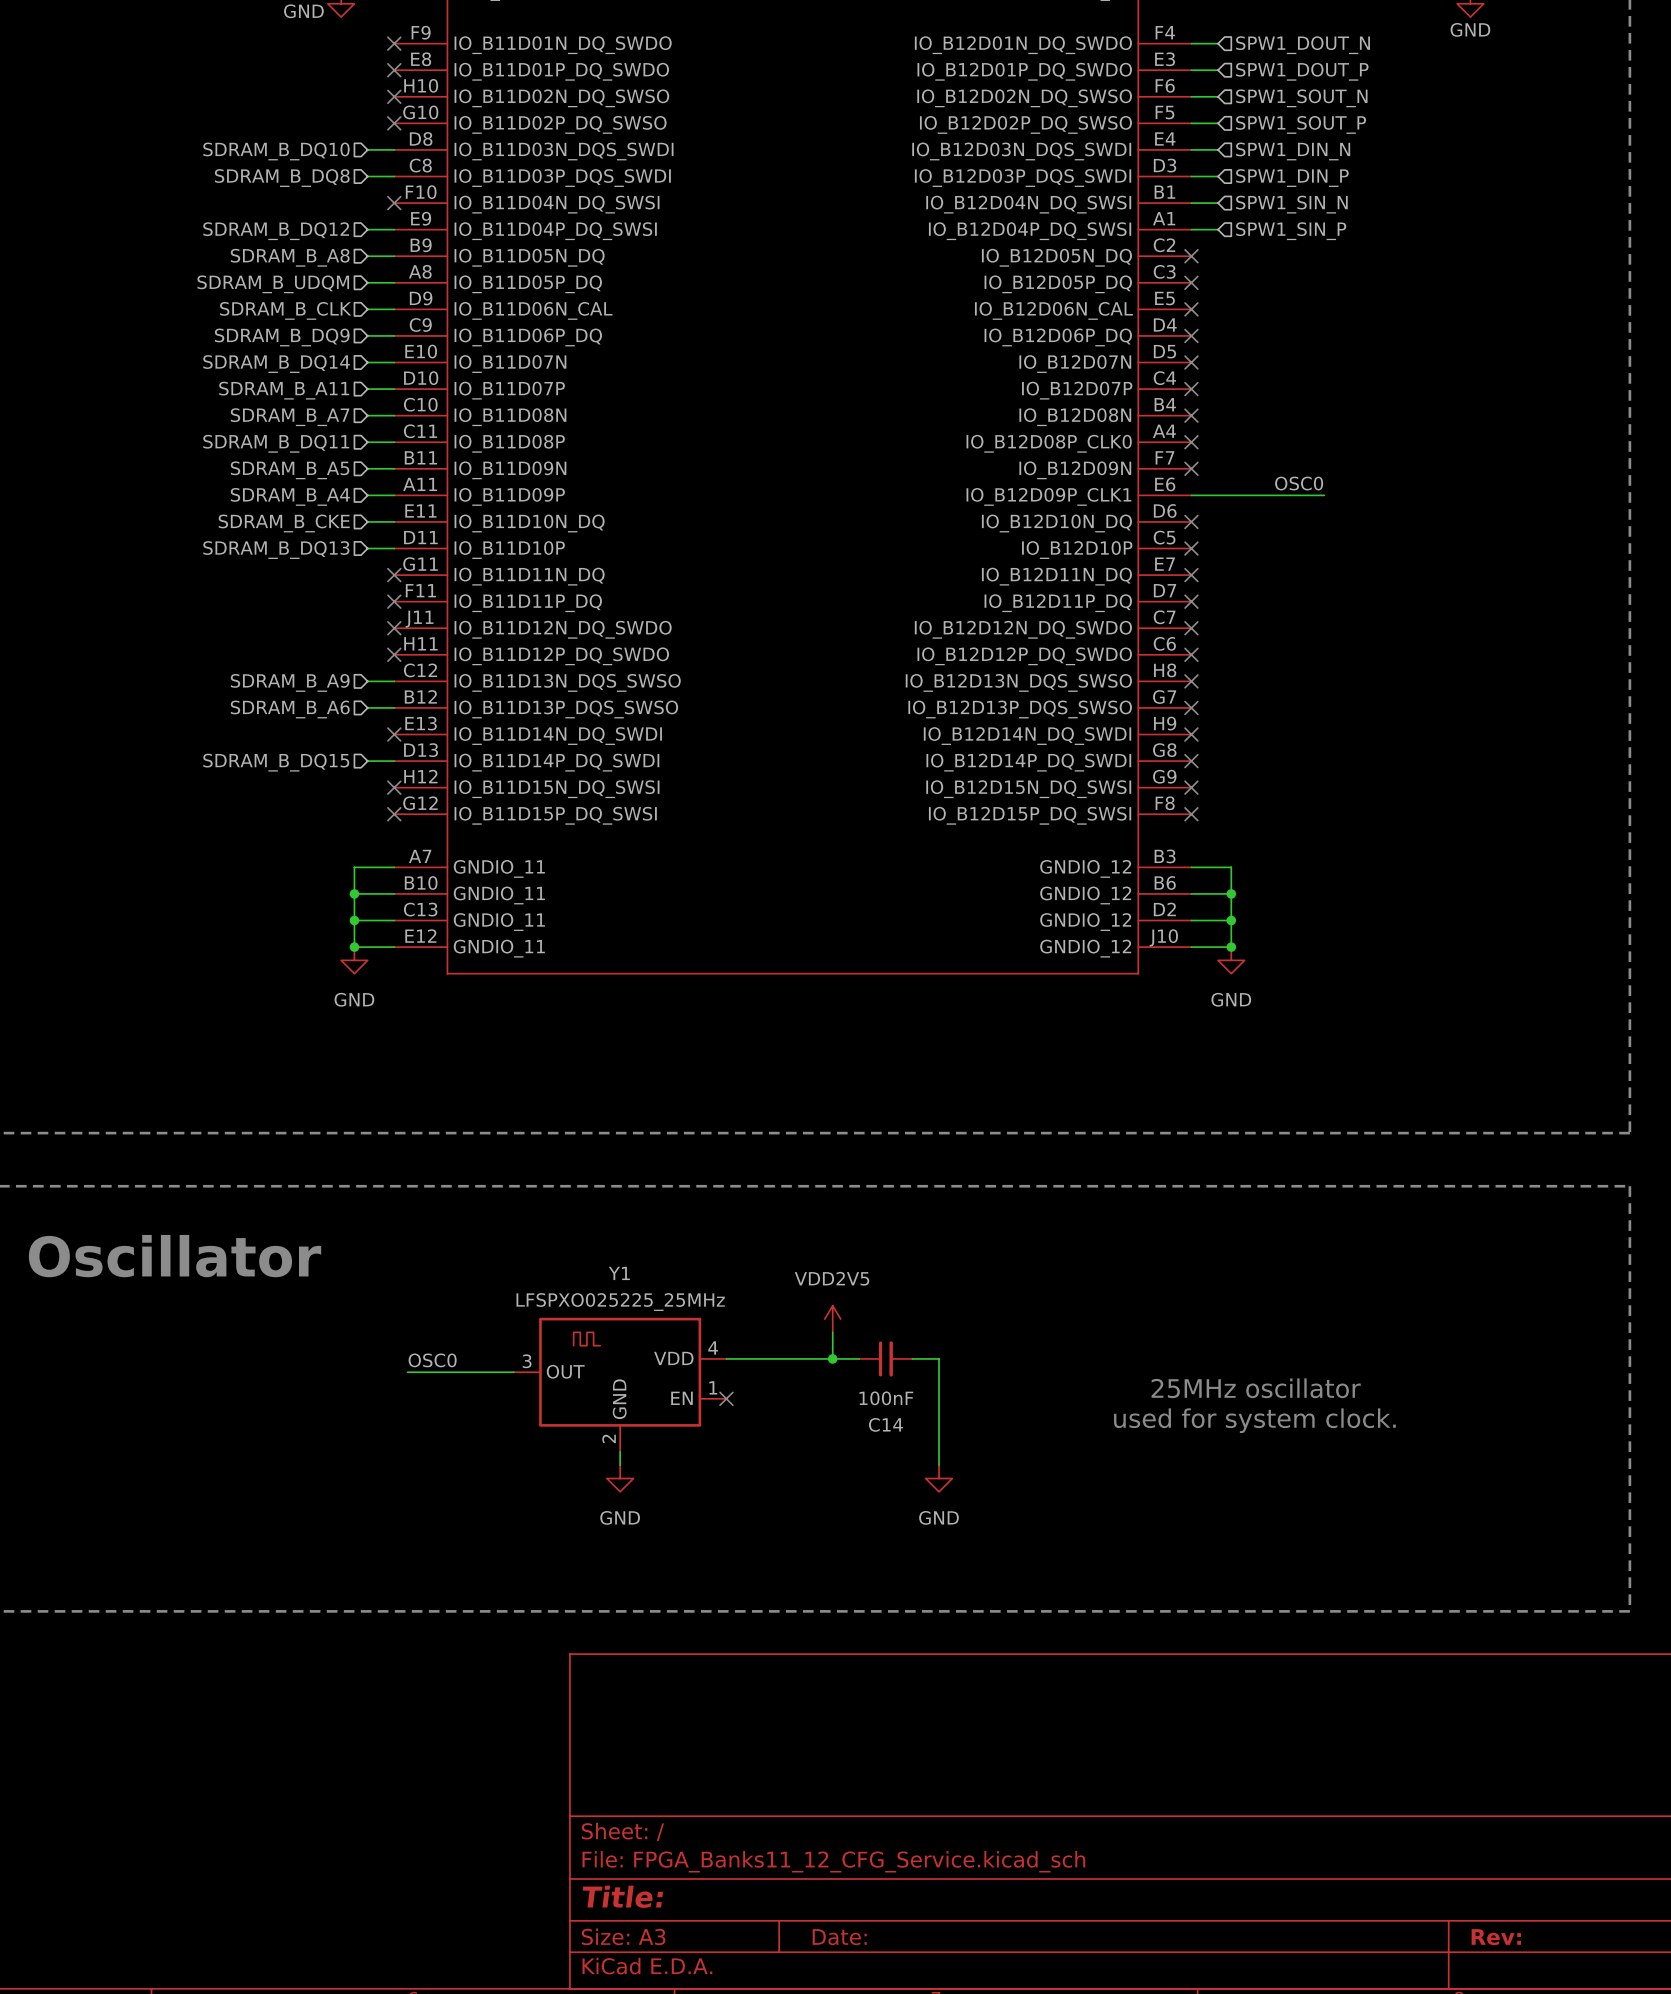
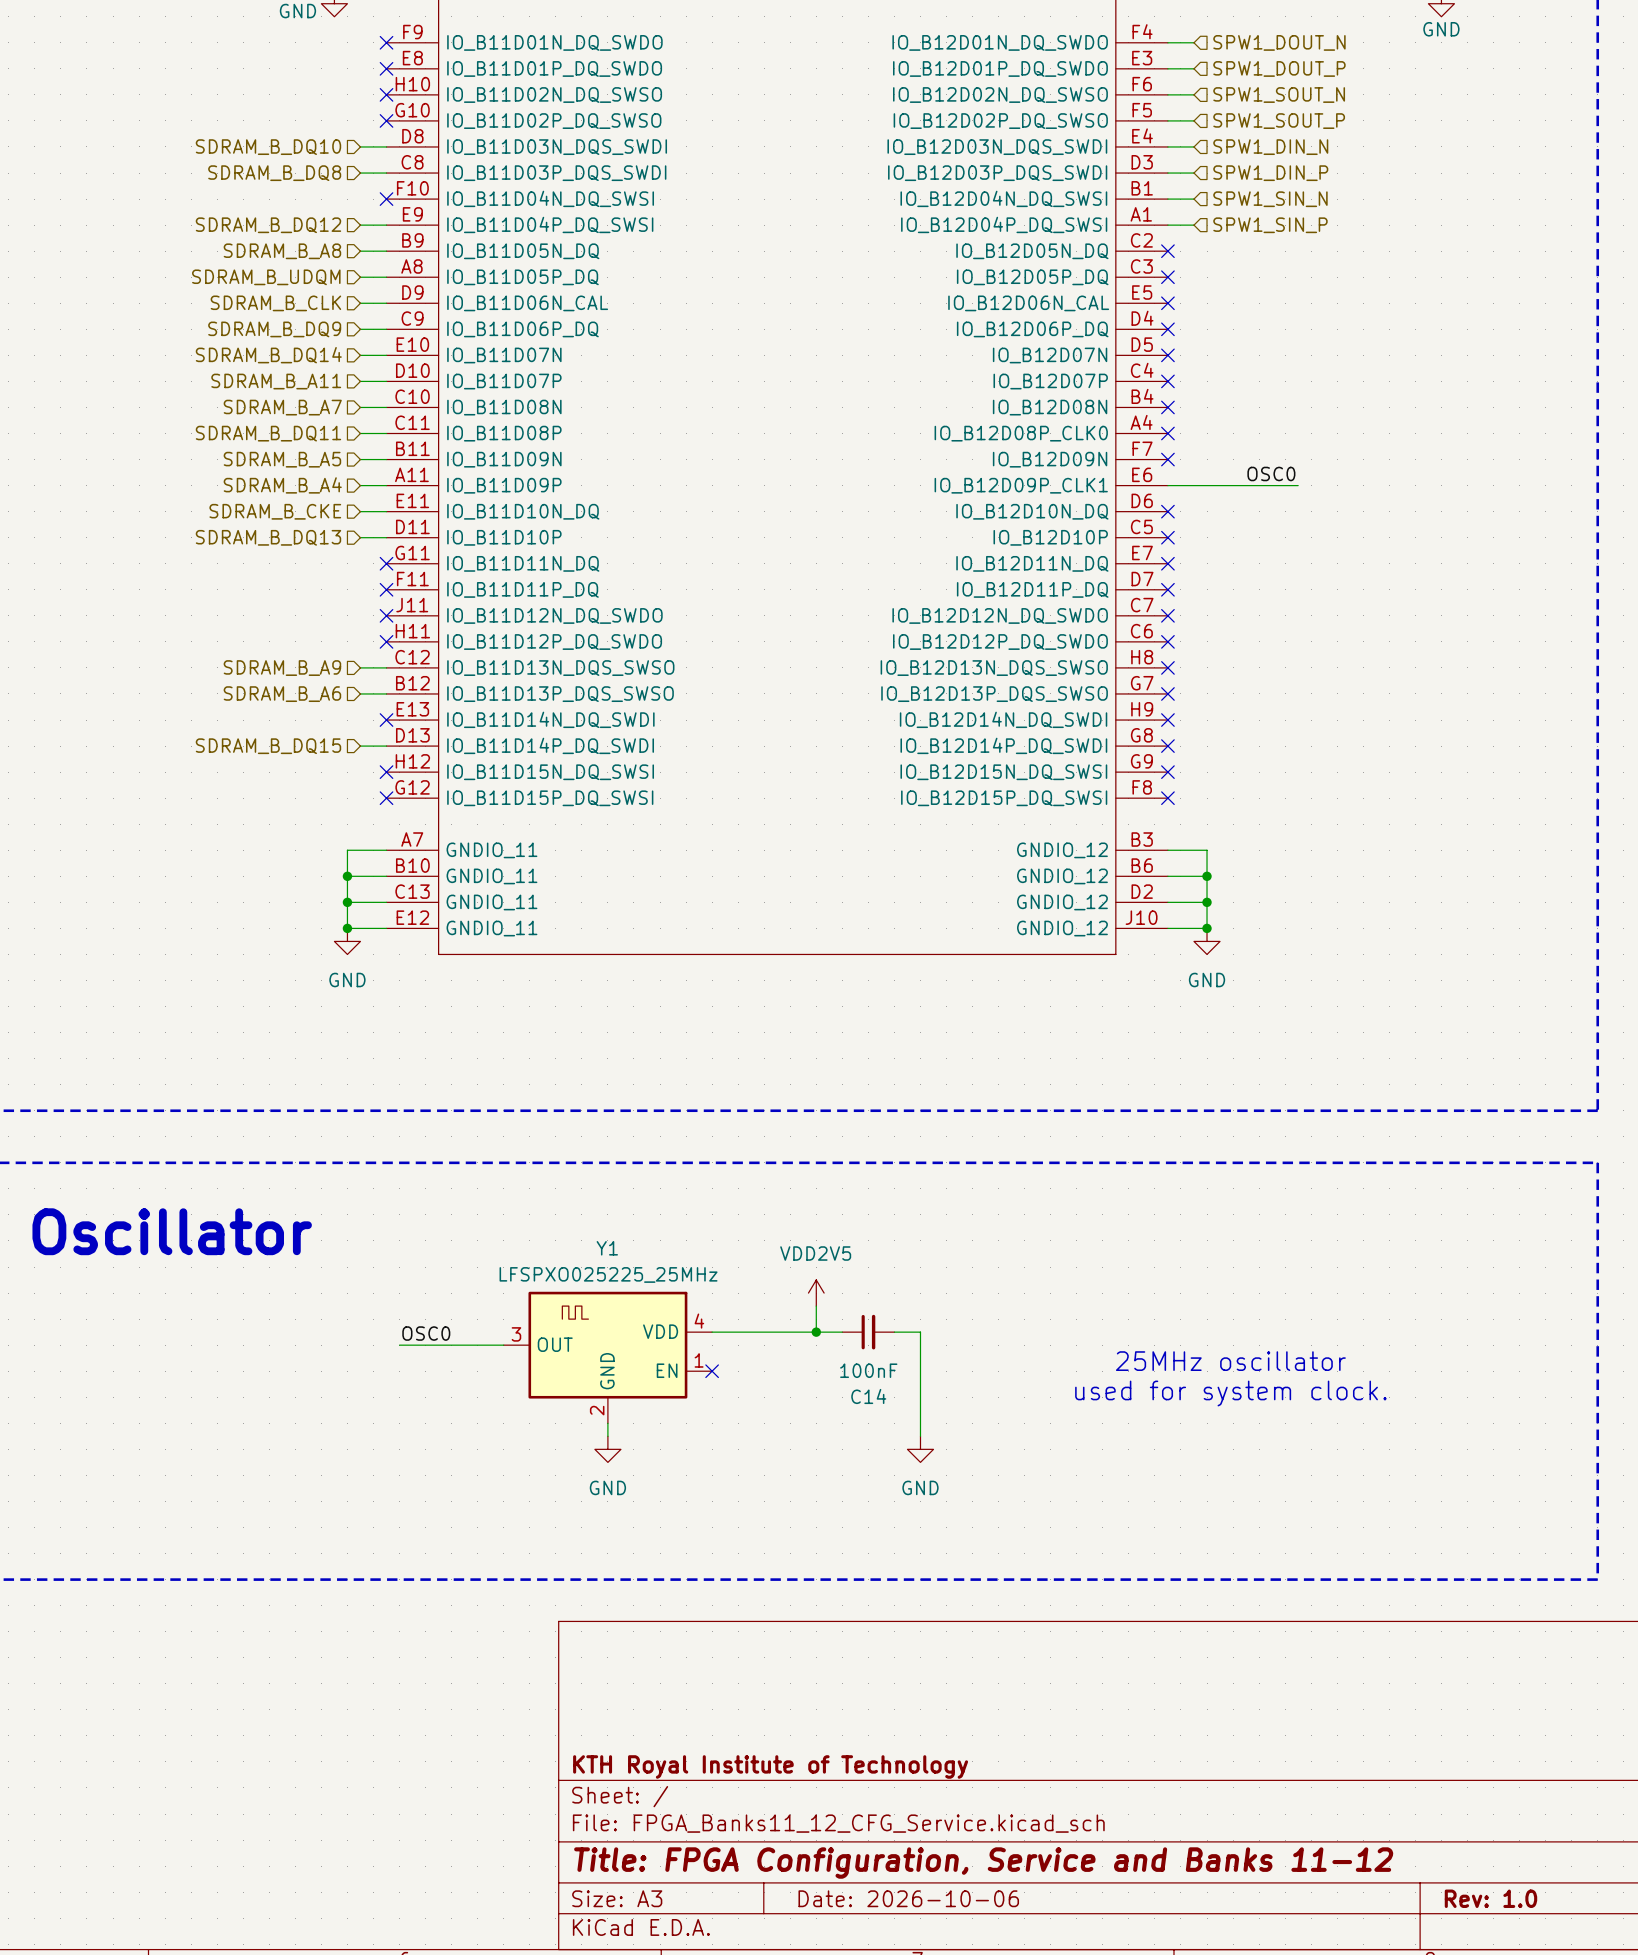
title block: none -> KTH Royal Institute of Technology (770, 1766)
title block: Title: (622, 1896) -> Title: FPGA Configuration, Service and Banks 11-12 (983, 1863)
title block: Date: (839, 1937) -> Date: 2026-10-06 (908, 1898)
title block: Rev: (1496, 1937) -> Rev: 1.0 (1490, 1898)

